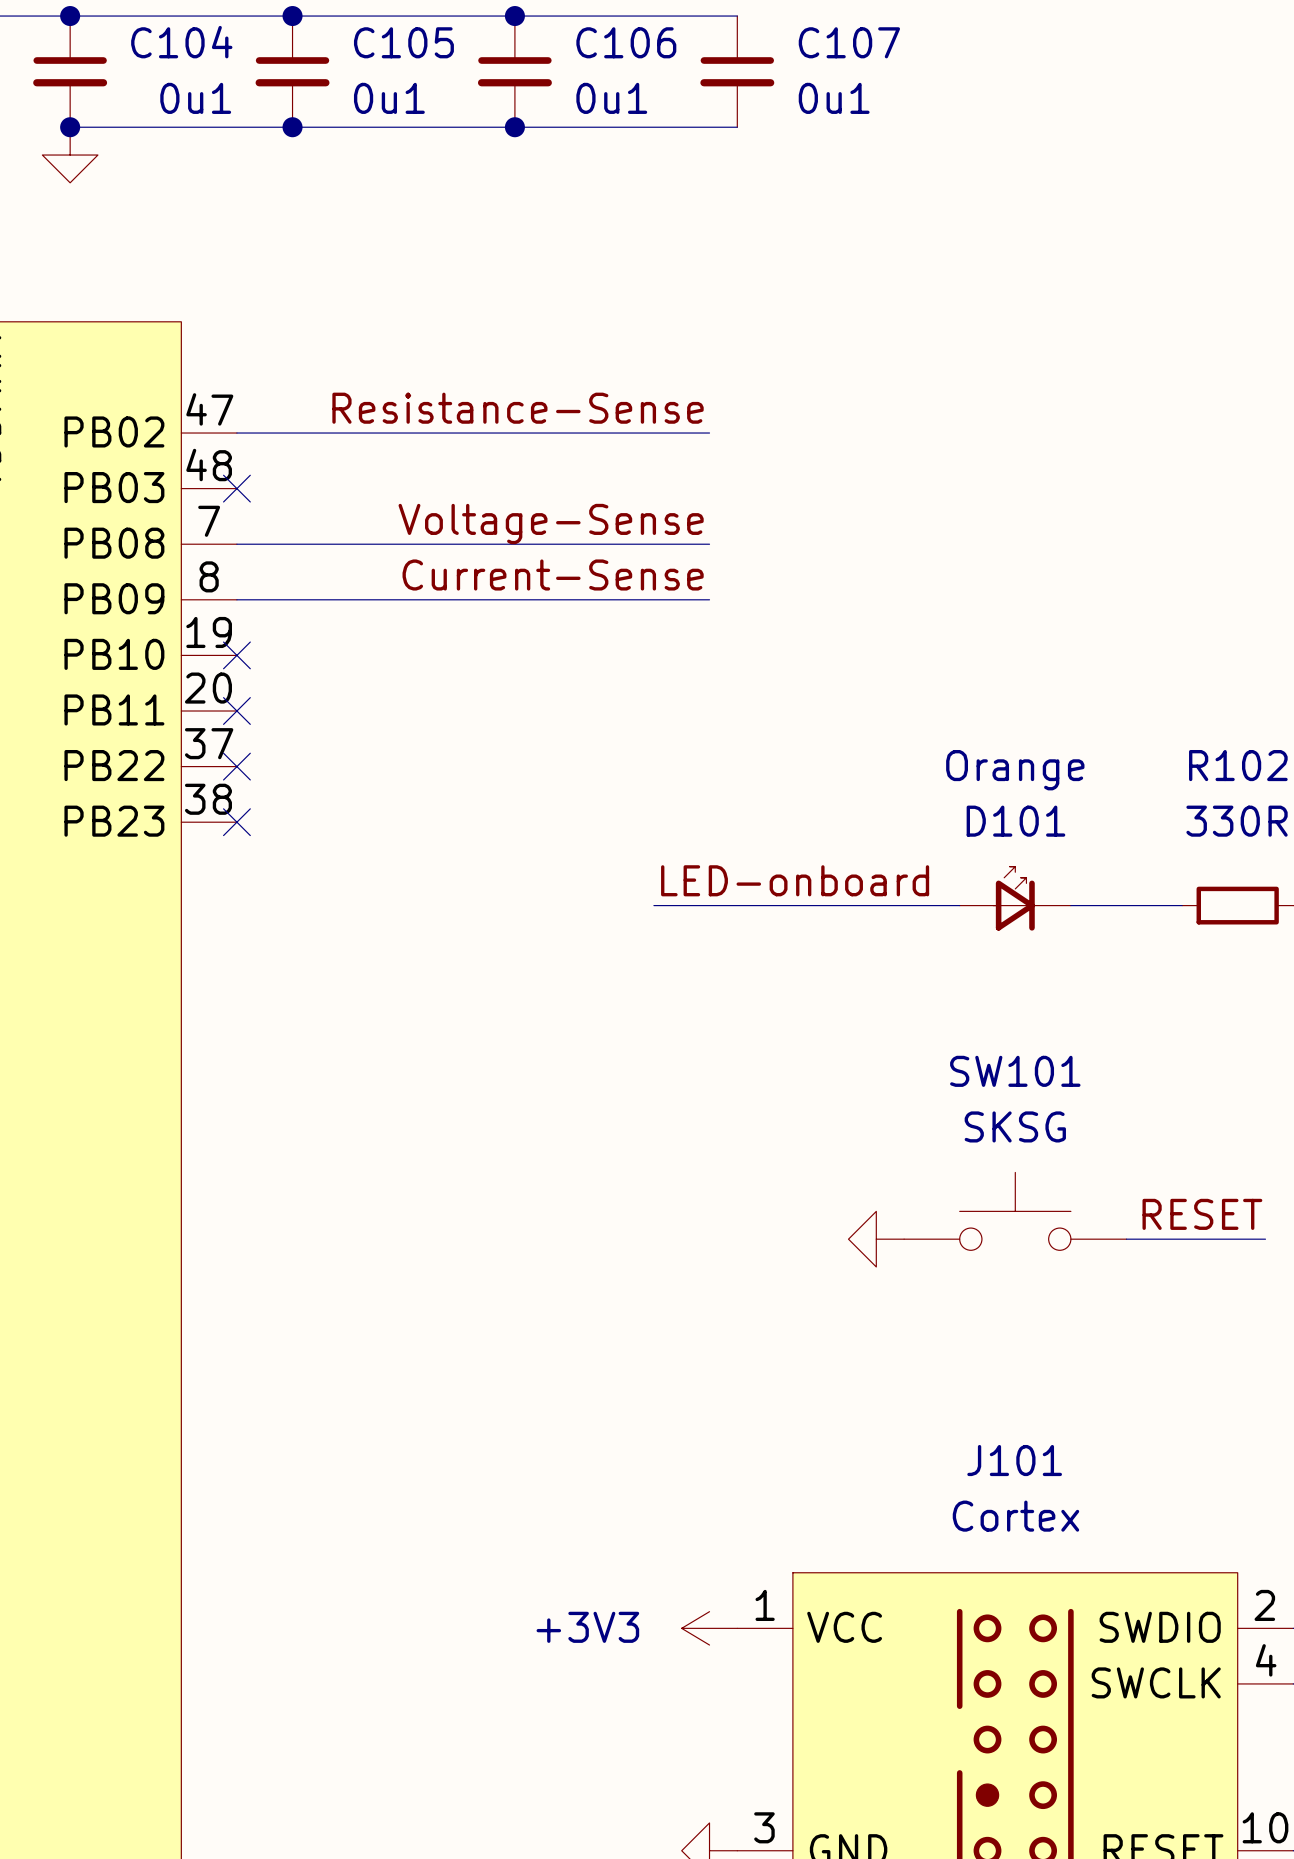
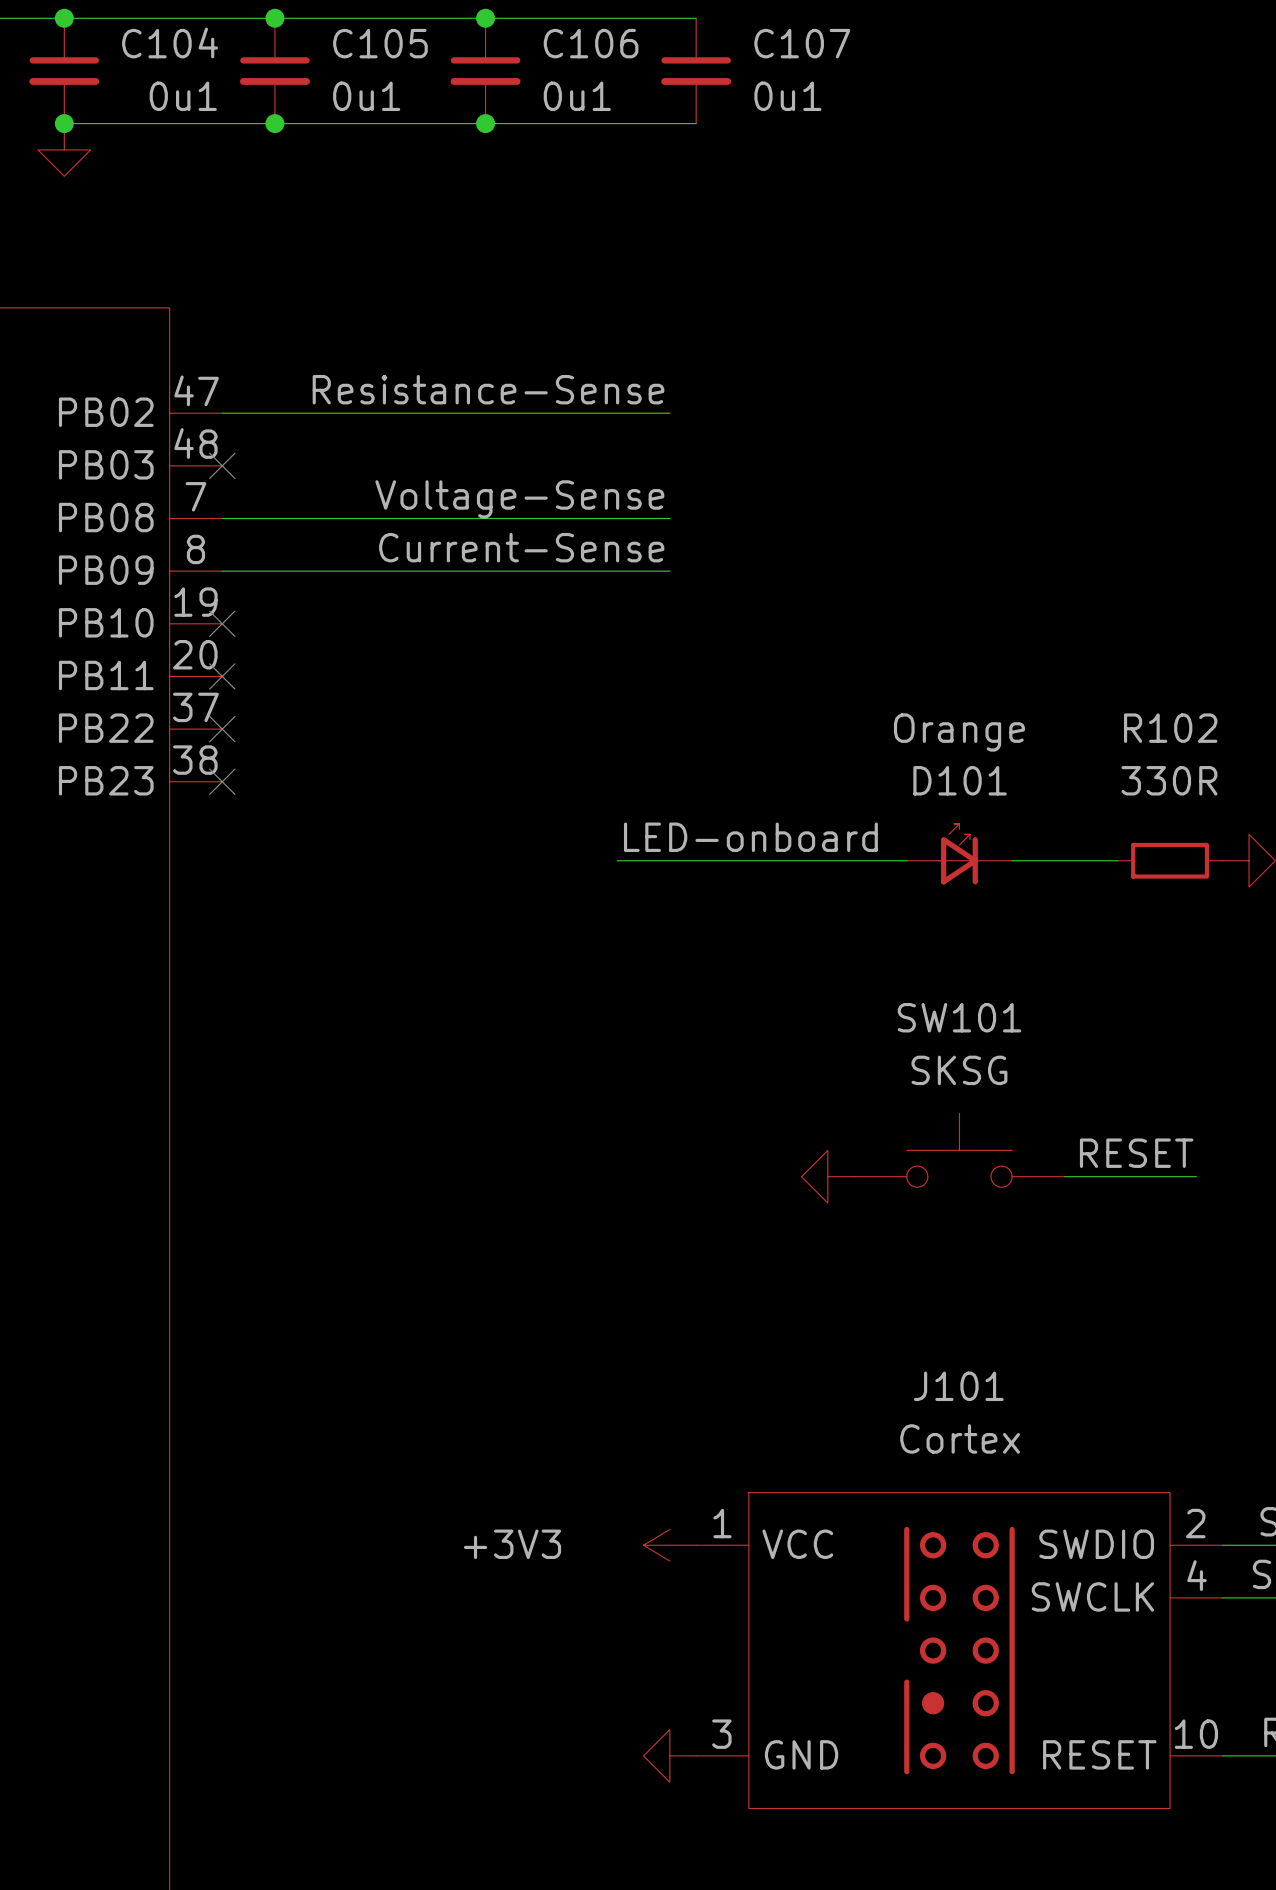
power symbol text position: +3V3 (587, 1627) -> +3V3 (512, 1544)

